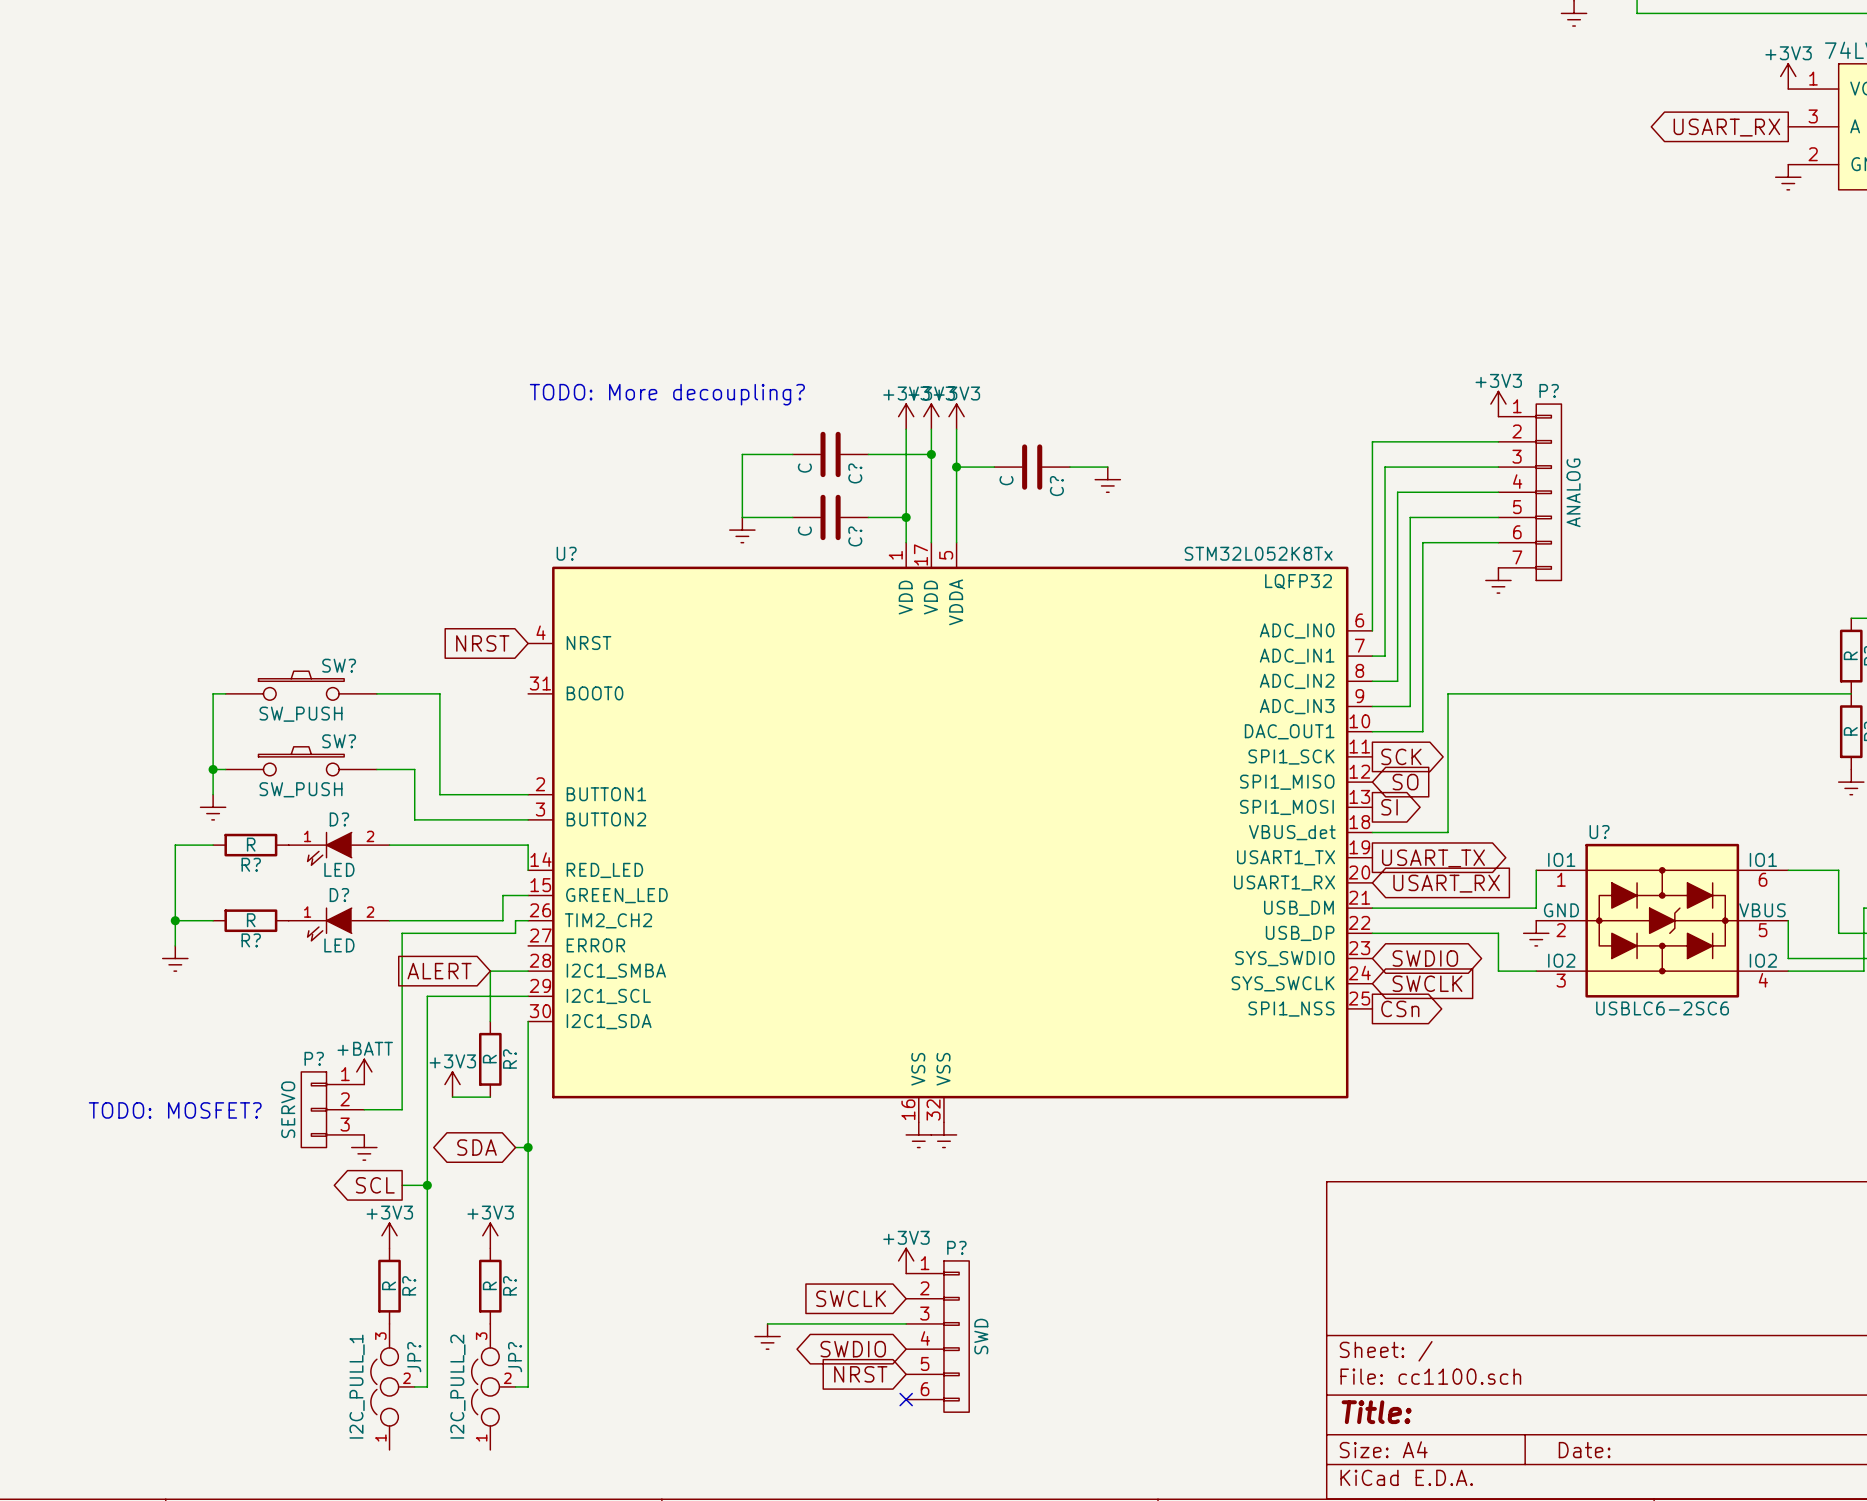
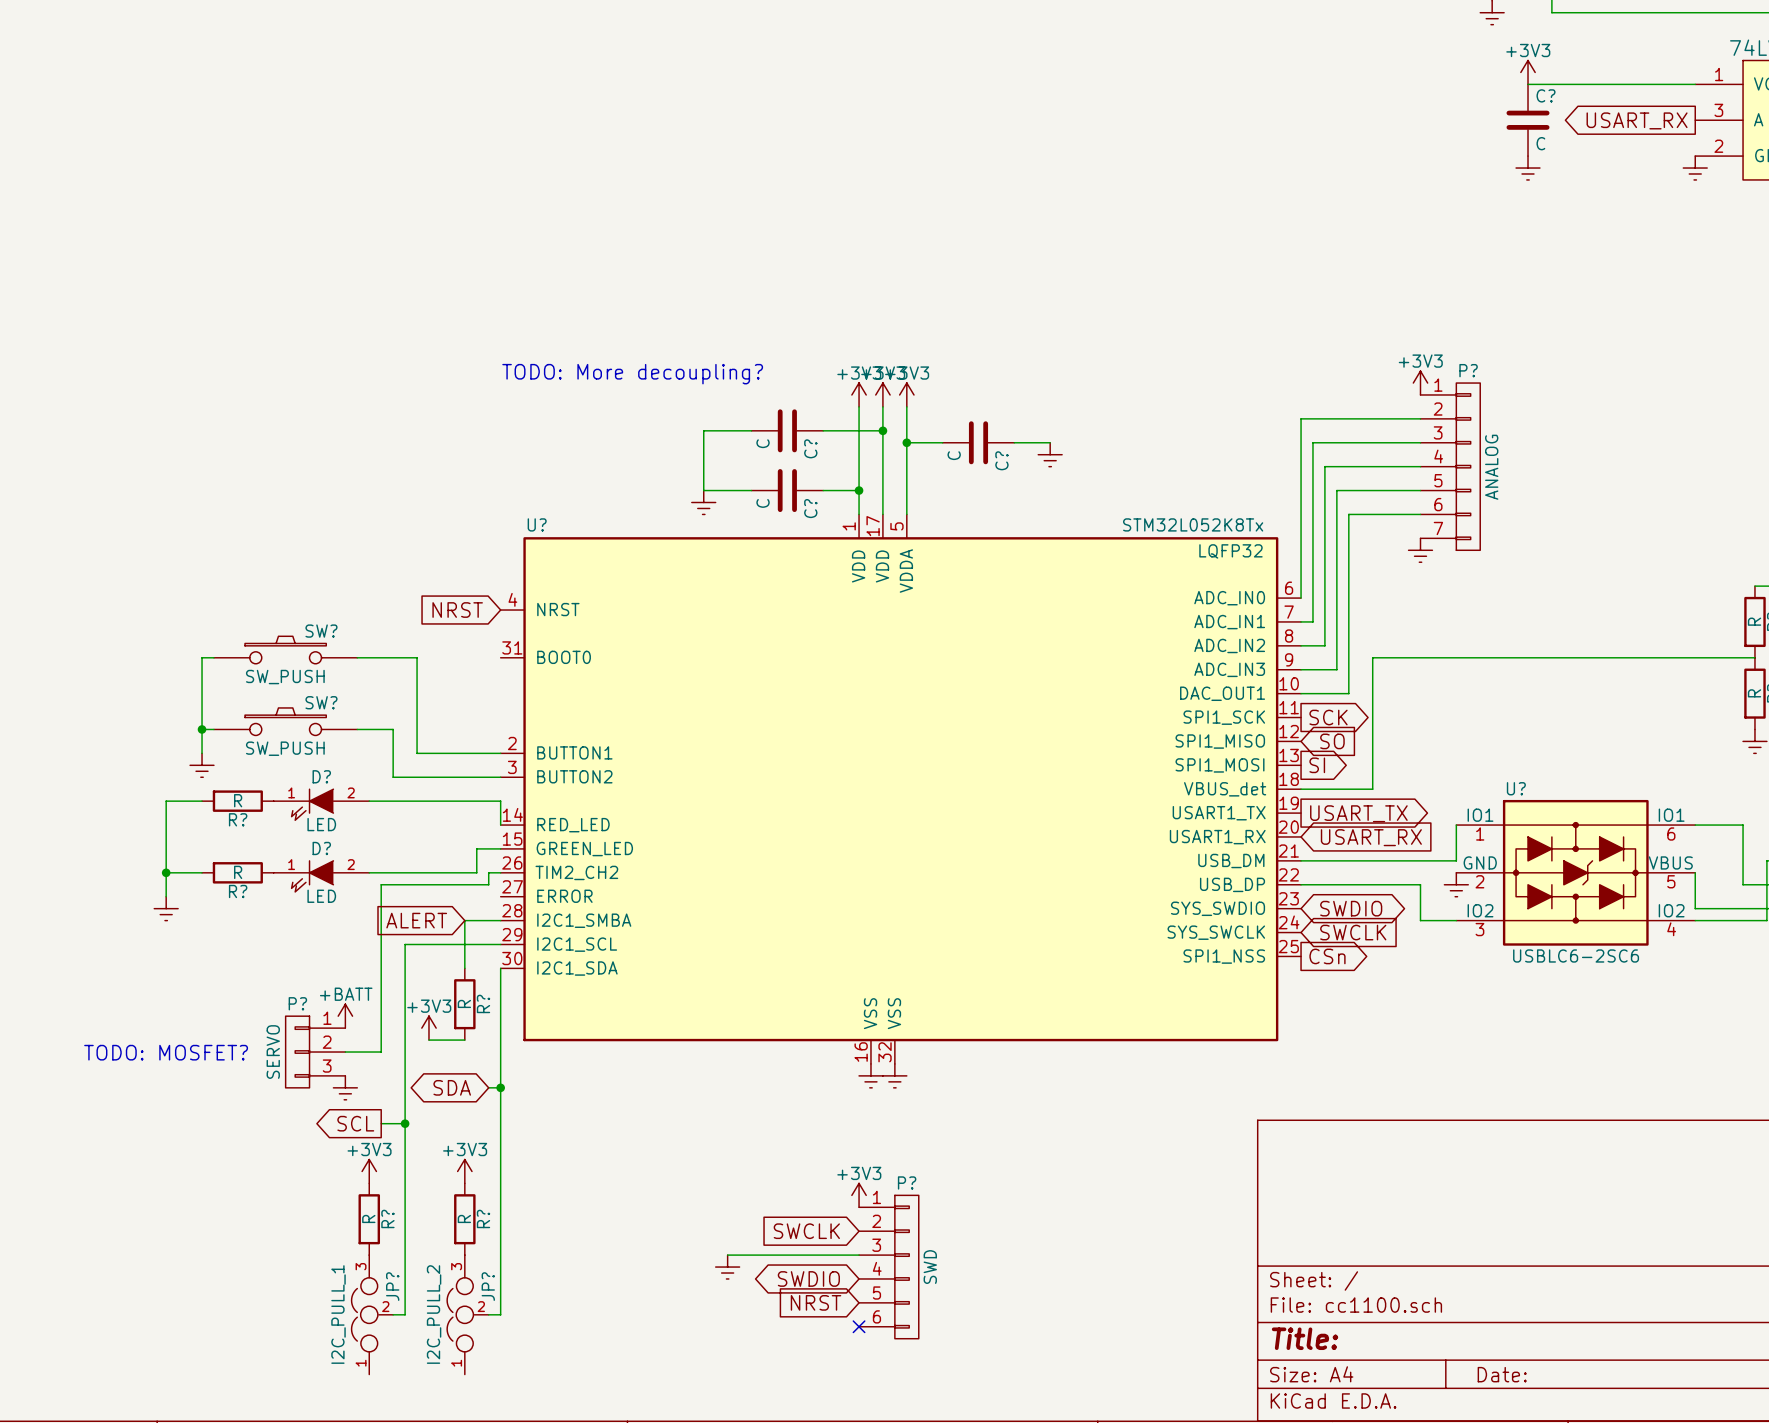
power symbol position: +3V3 (1788, 76) -> +3V3 (1528, 72)
wire: none -> (1528, 84) (1695, 84)
C?: none -> C (1528, 120)
power symbol: none -> (1528, 168)

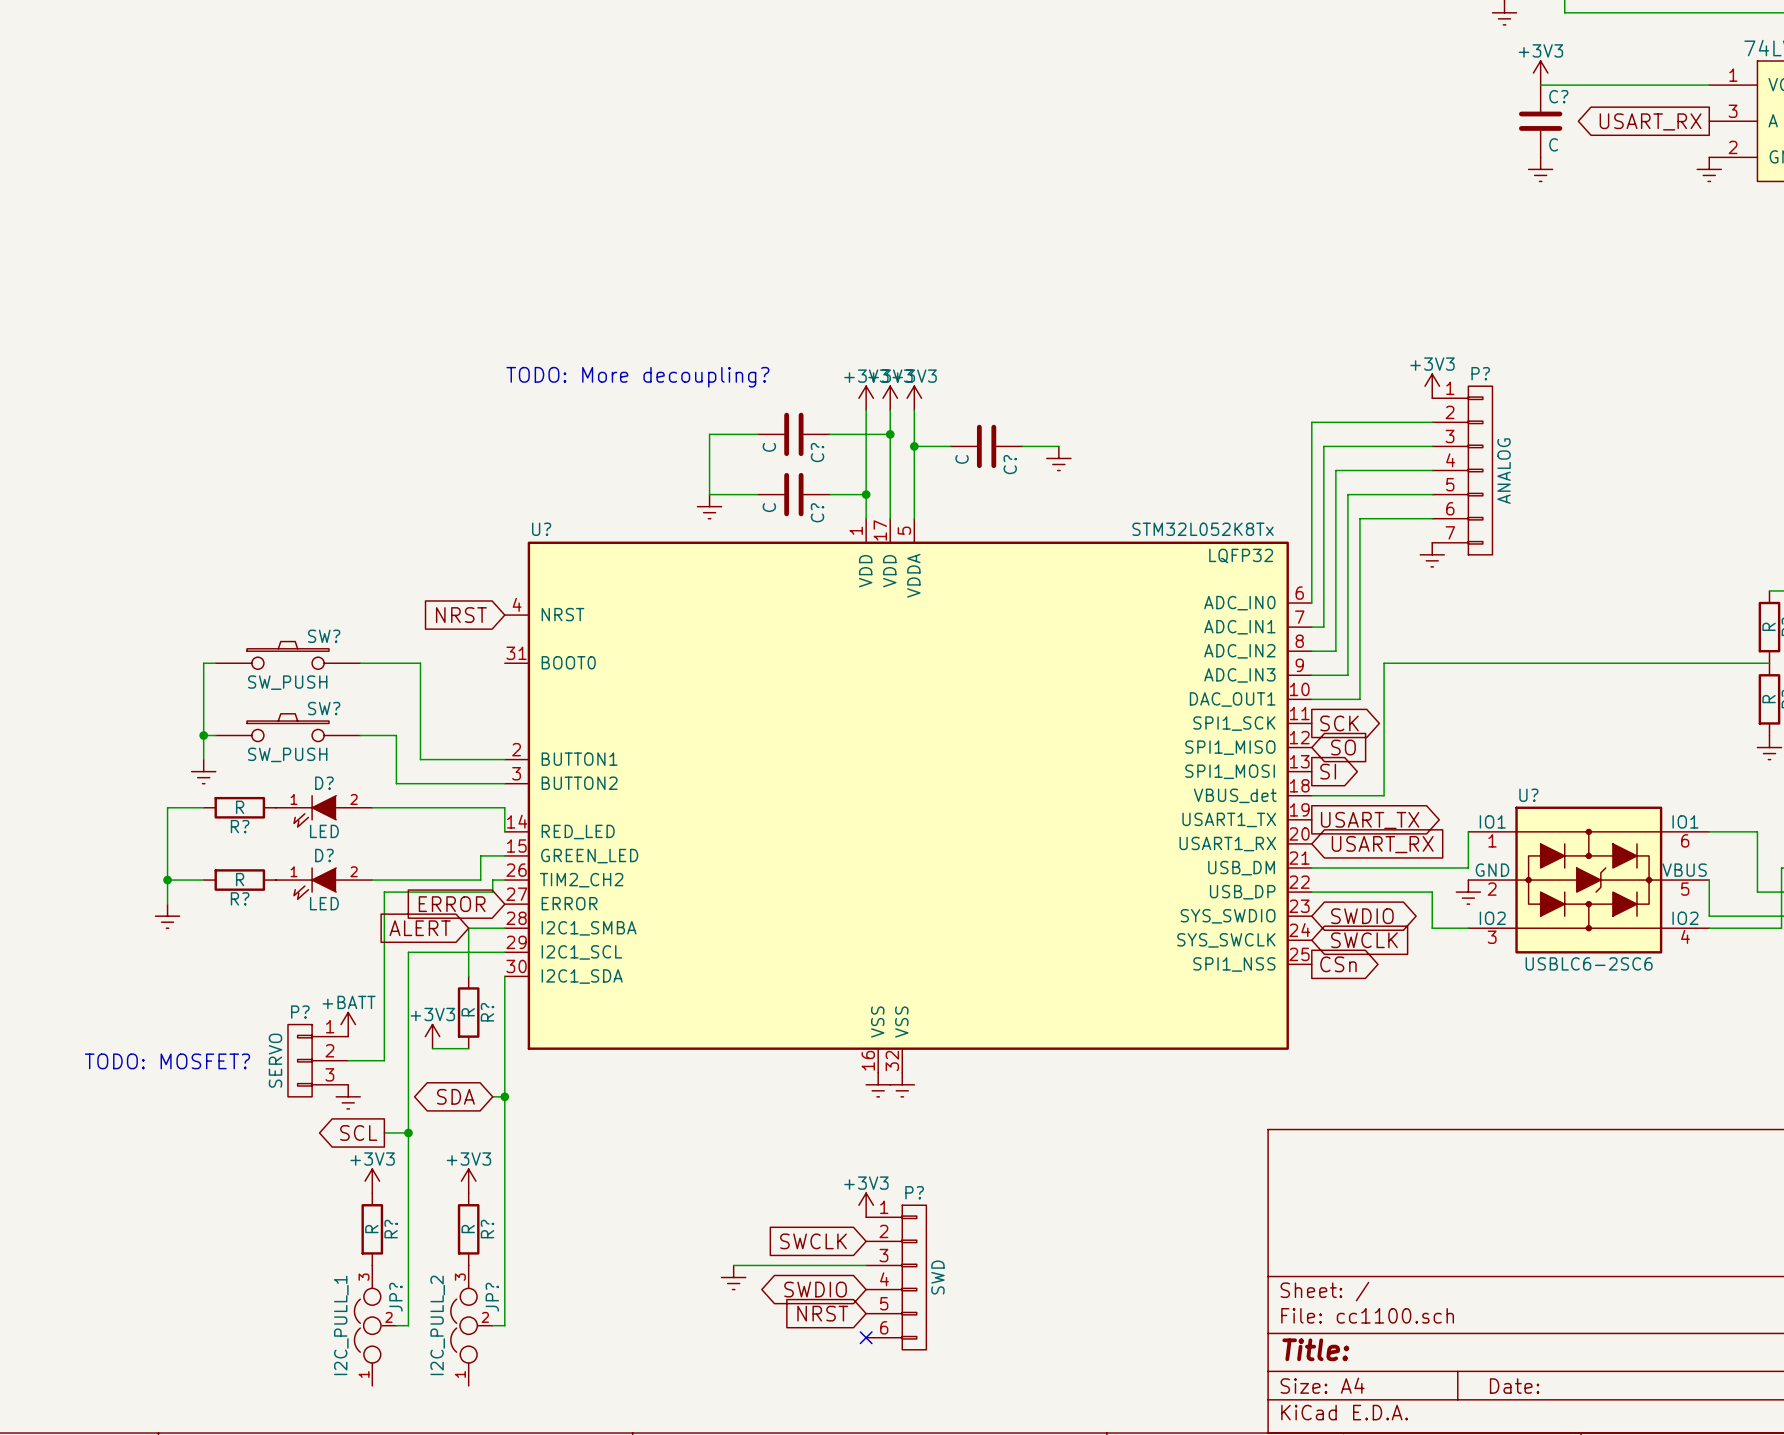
global label: none -> ERROR (452, 904)

